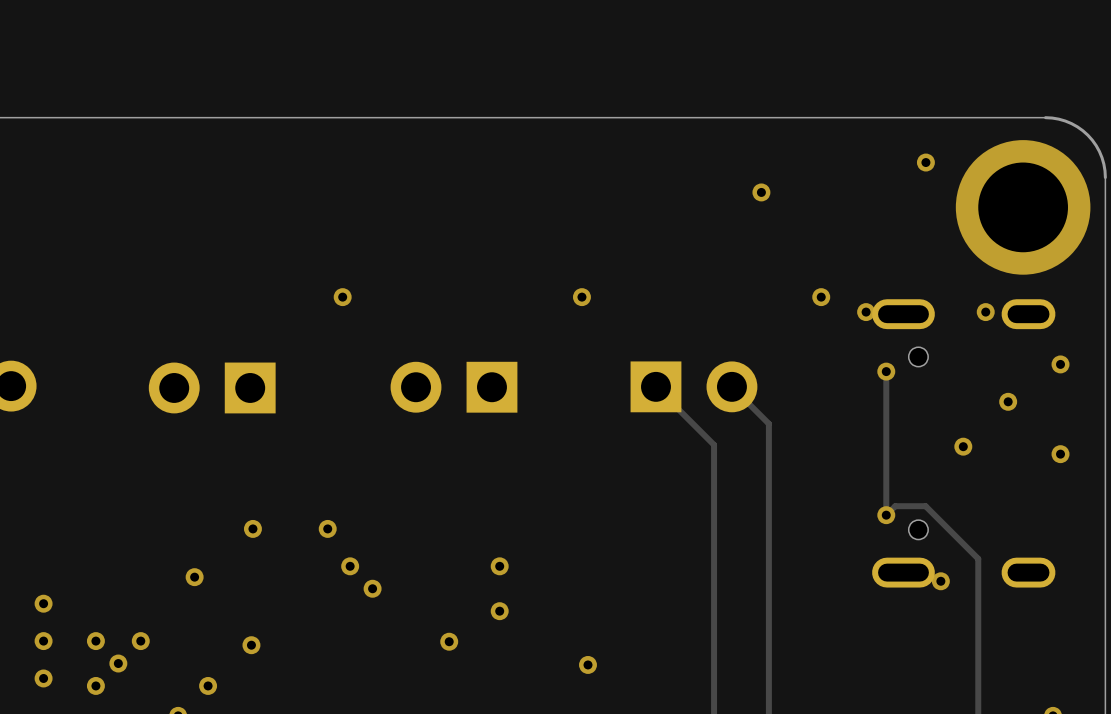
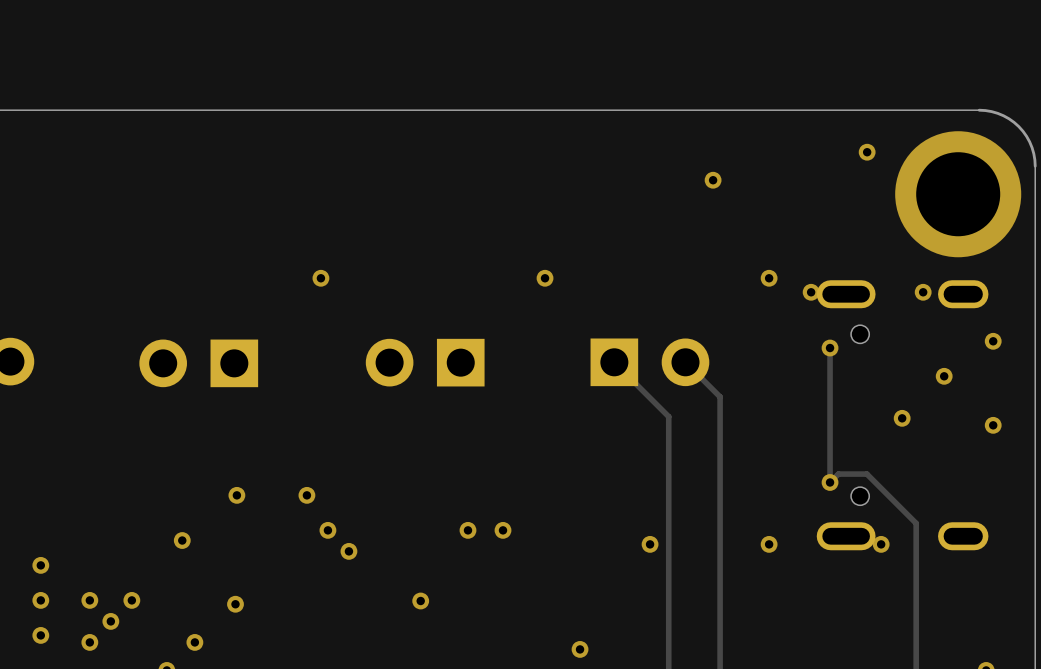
via: none -> (503, 530)
via: none -> (650, 544)
via: none -> (769, 544)
via: (499, 611) -> none
via position: (588, 664) -> (580, 649)

